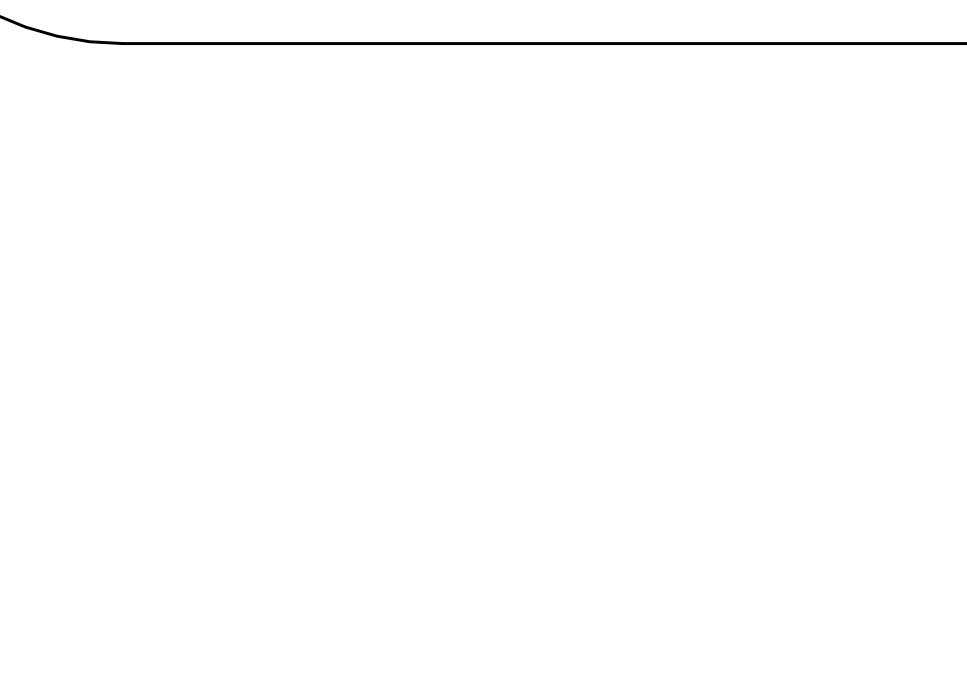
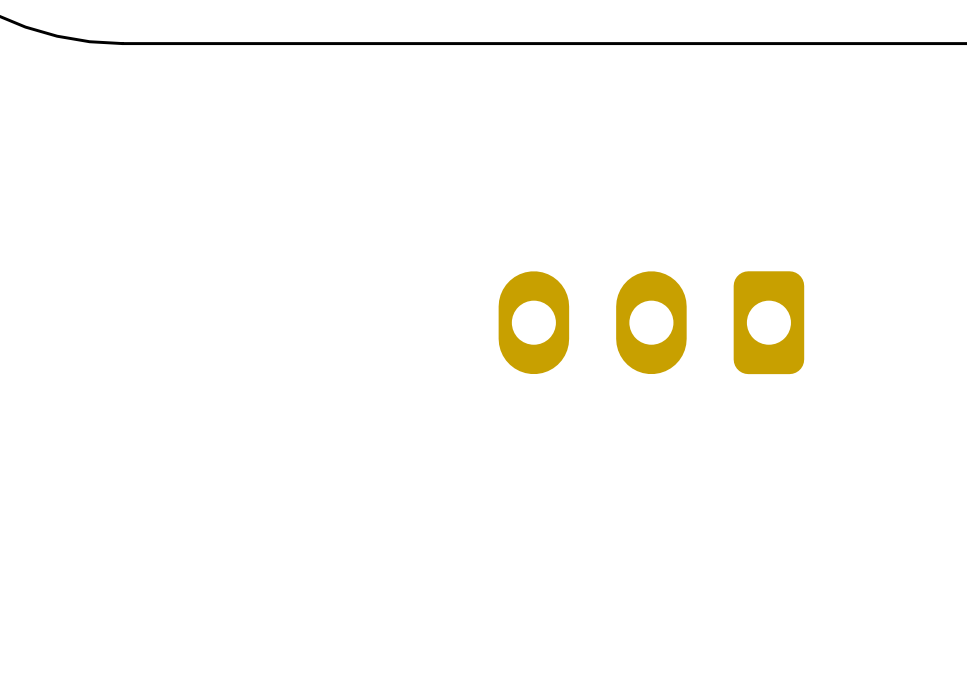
part: none -> (651, 322)

